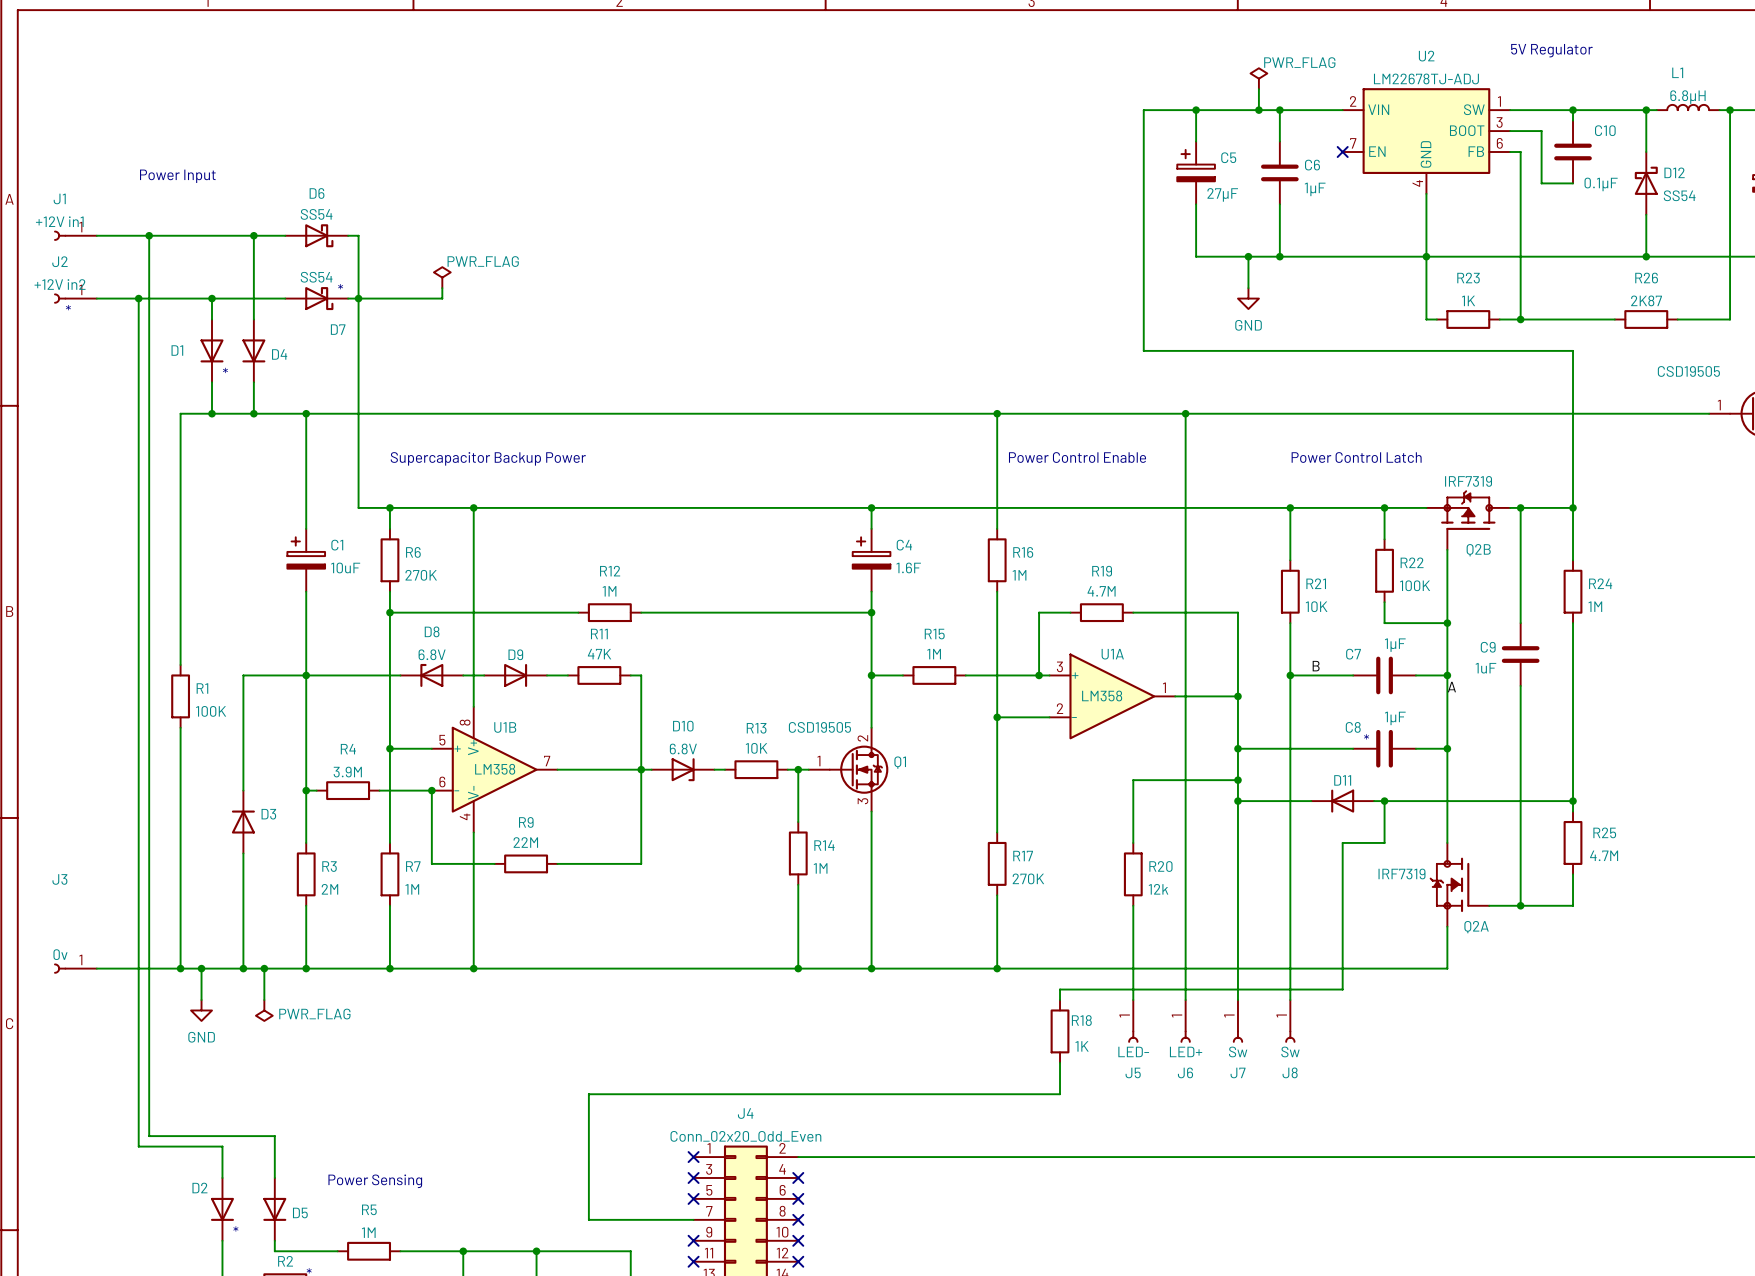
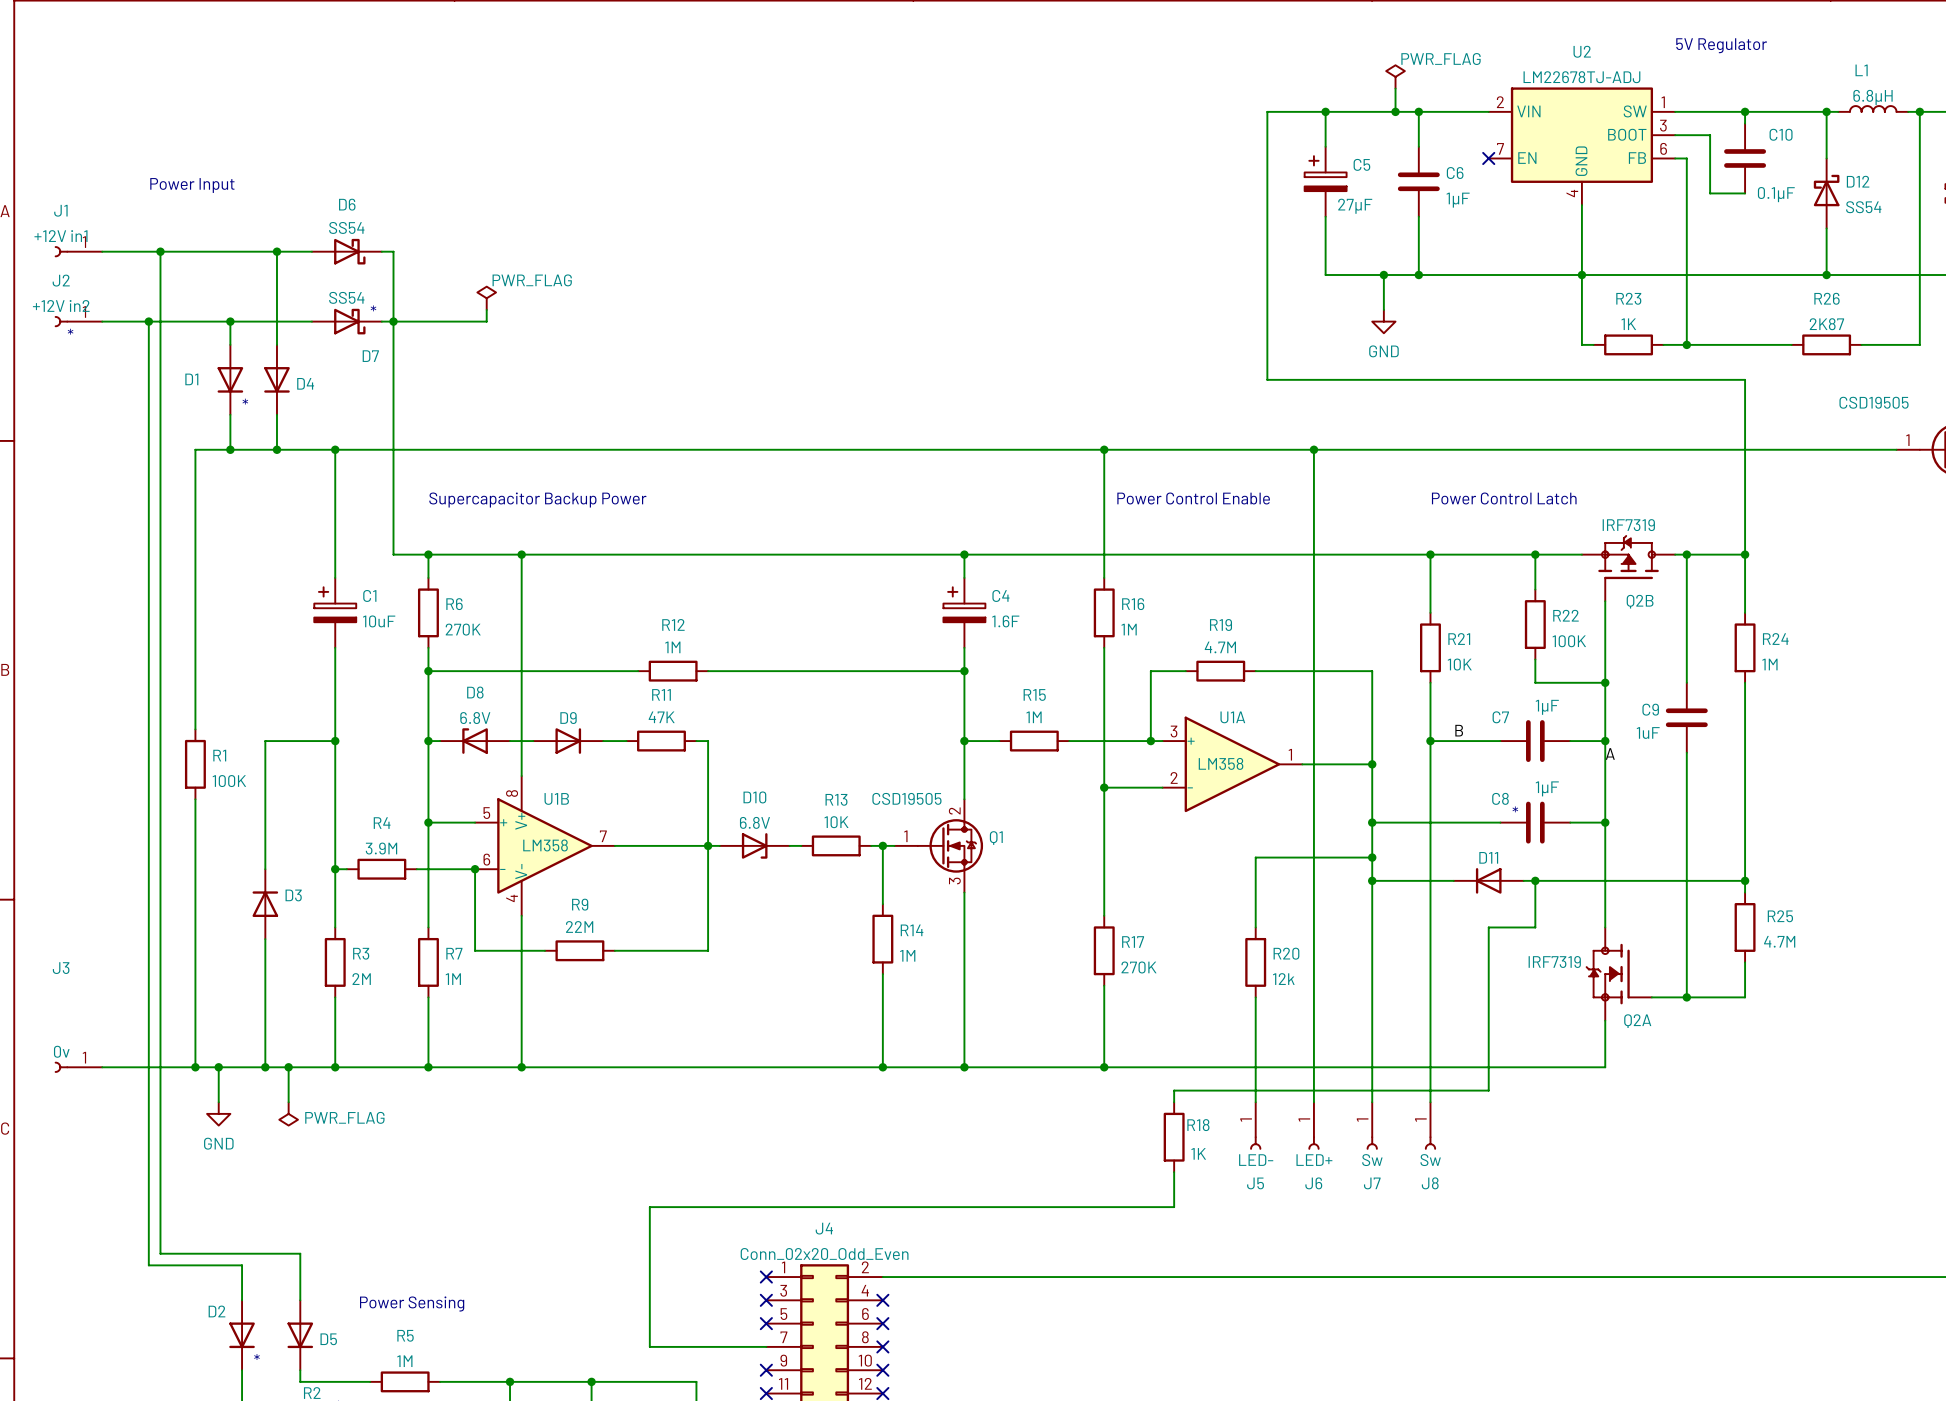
wire: (306, 675) (389, 675) -> none
junction: none -> (428, 741)

